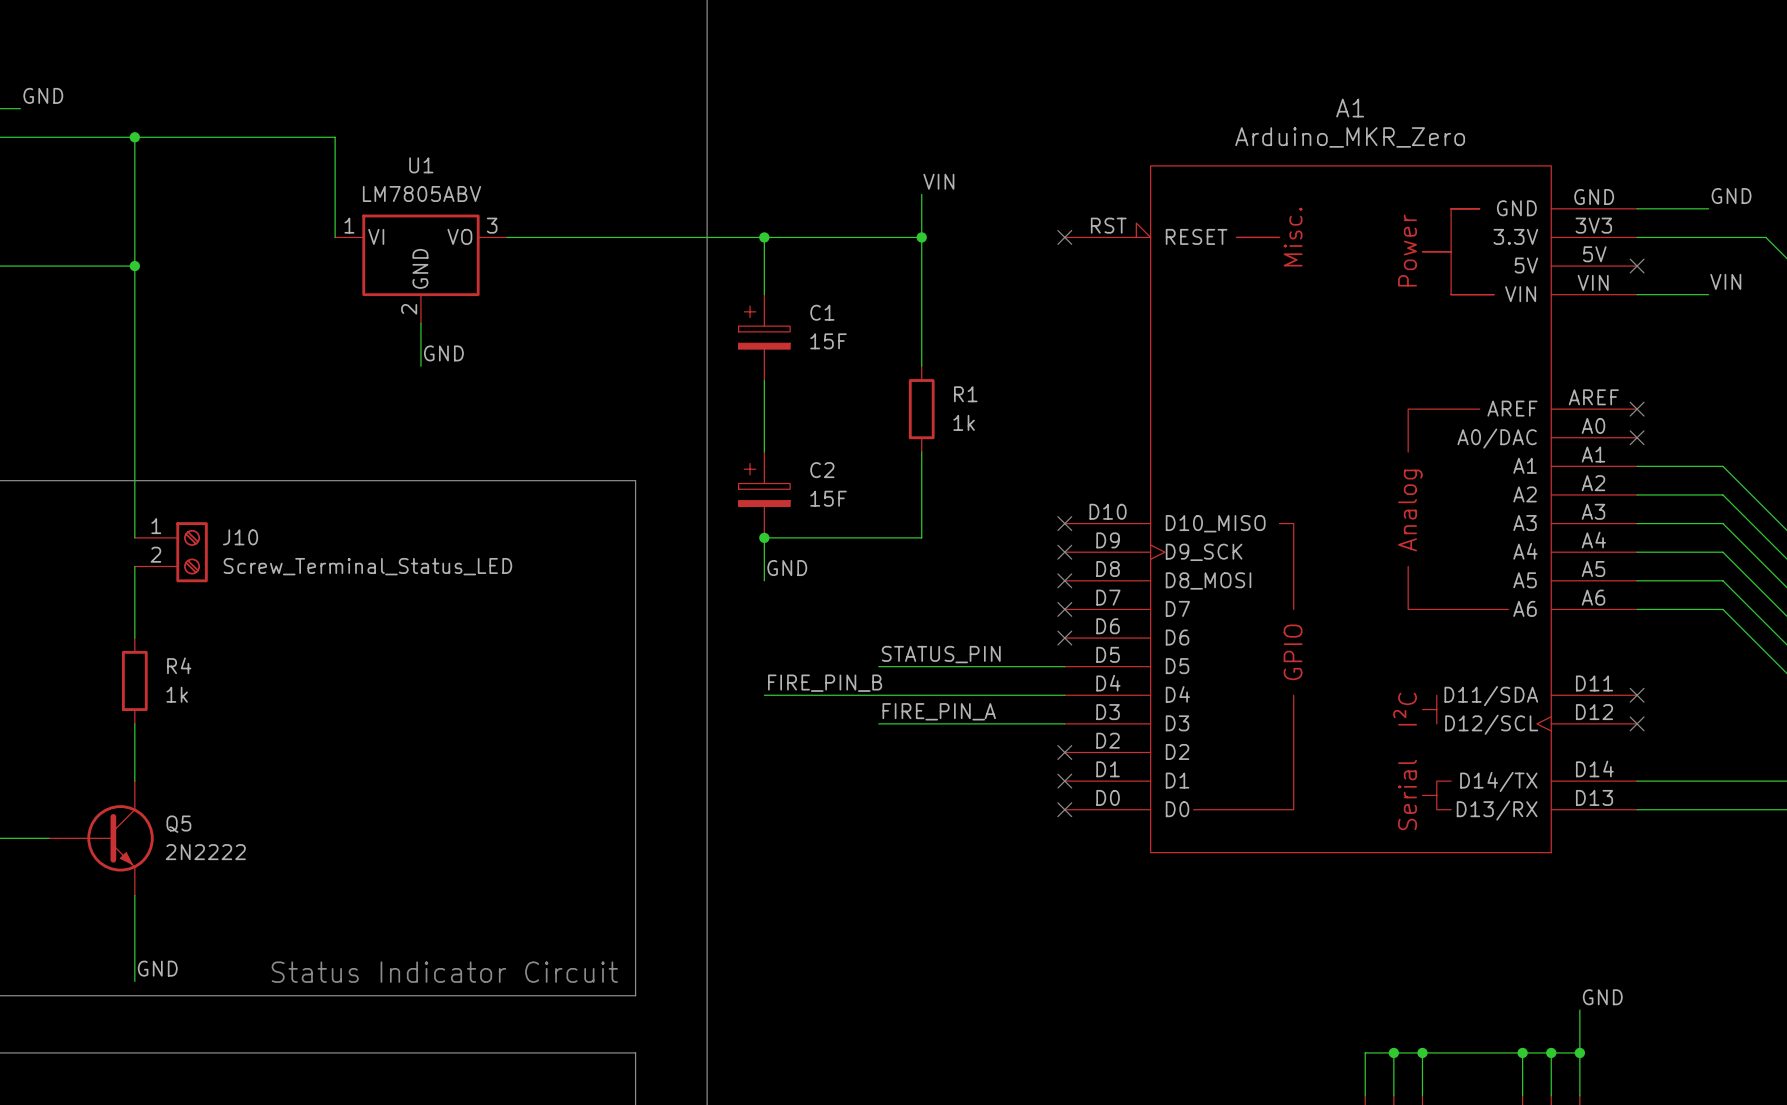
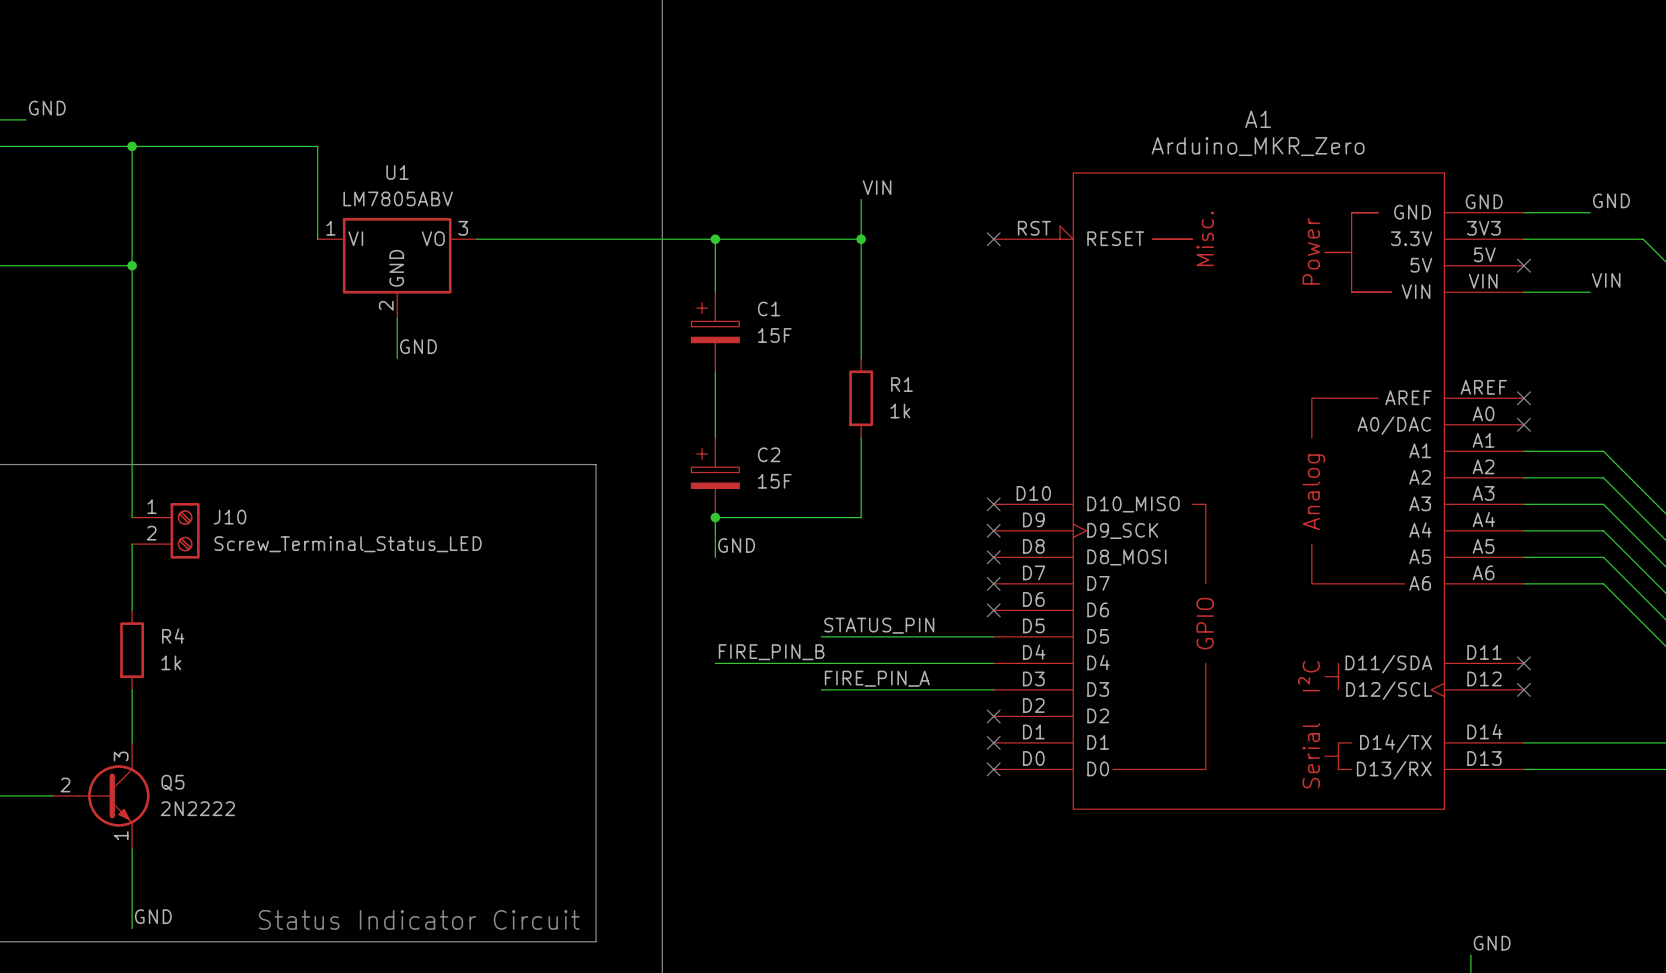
Q5 pin number: none -> 3 (121, 756)
Q5 pin number: none -> 2 (65, 785)
Q5 pin number: none -> 1 (121, 835)

